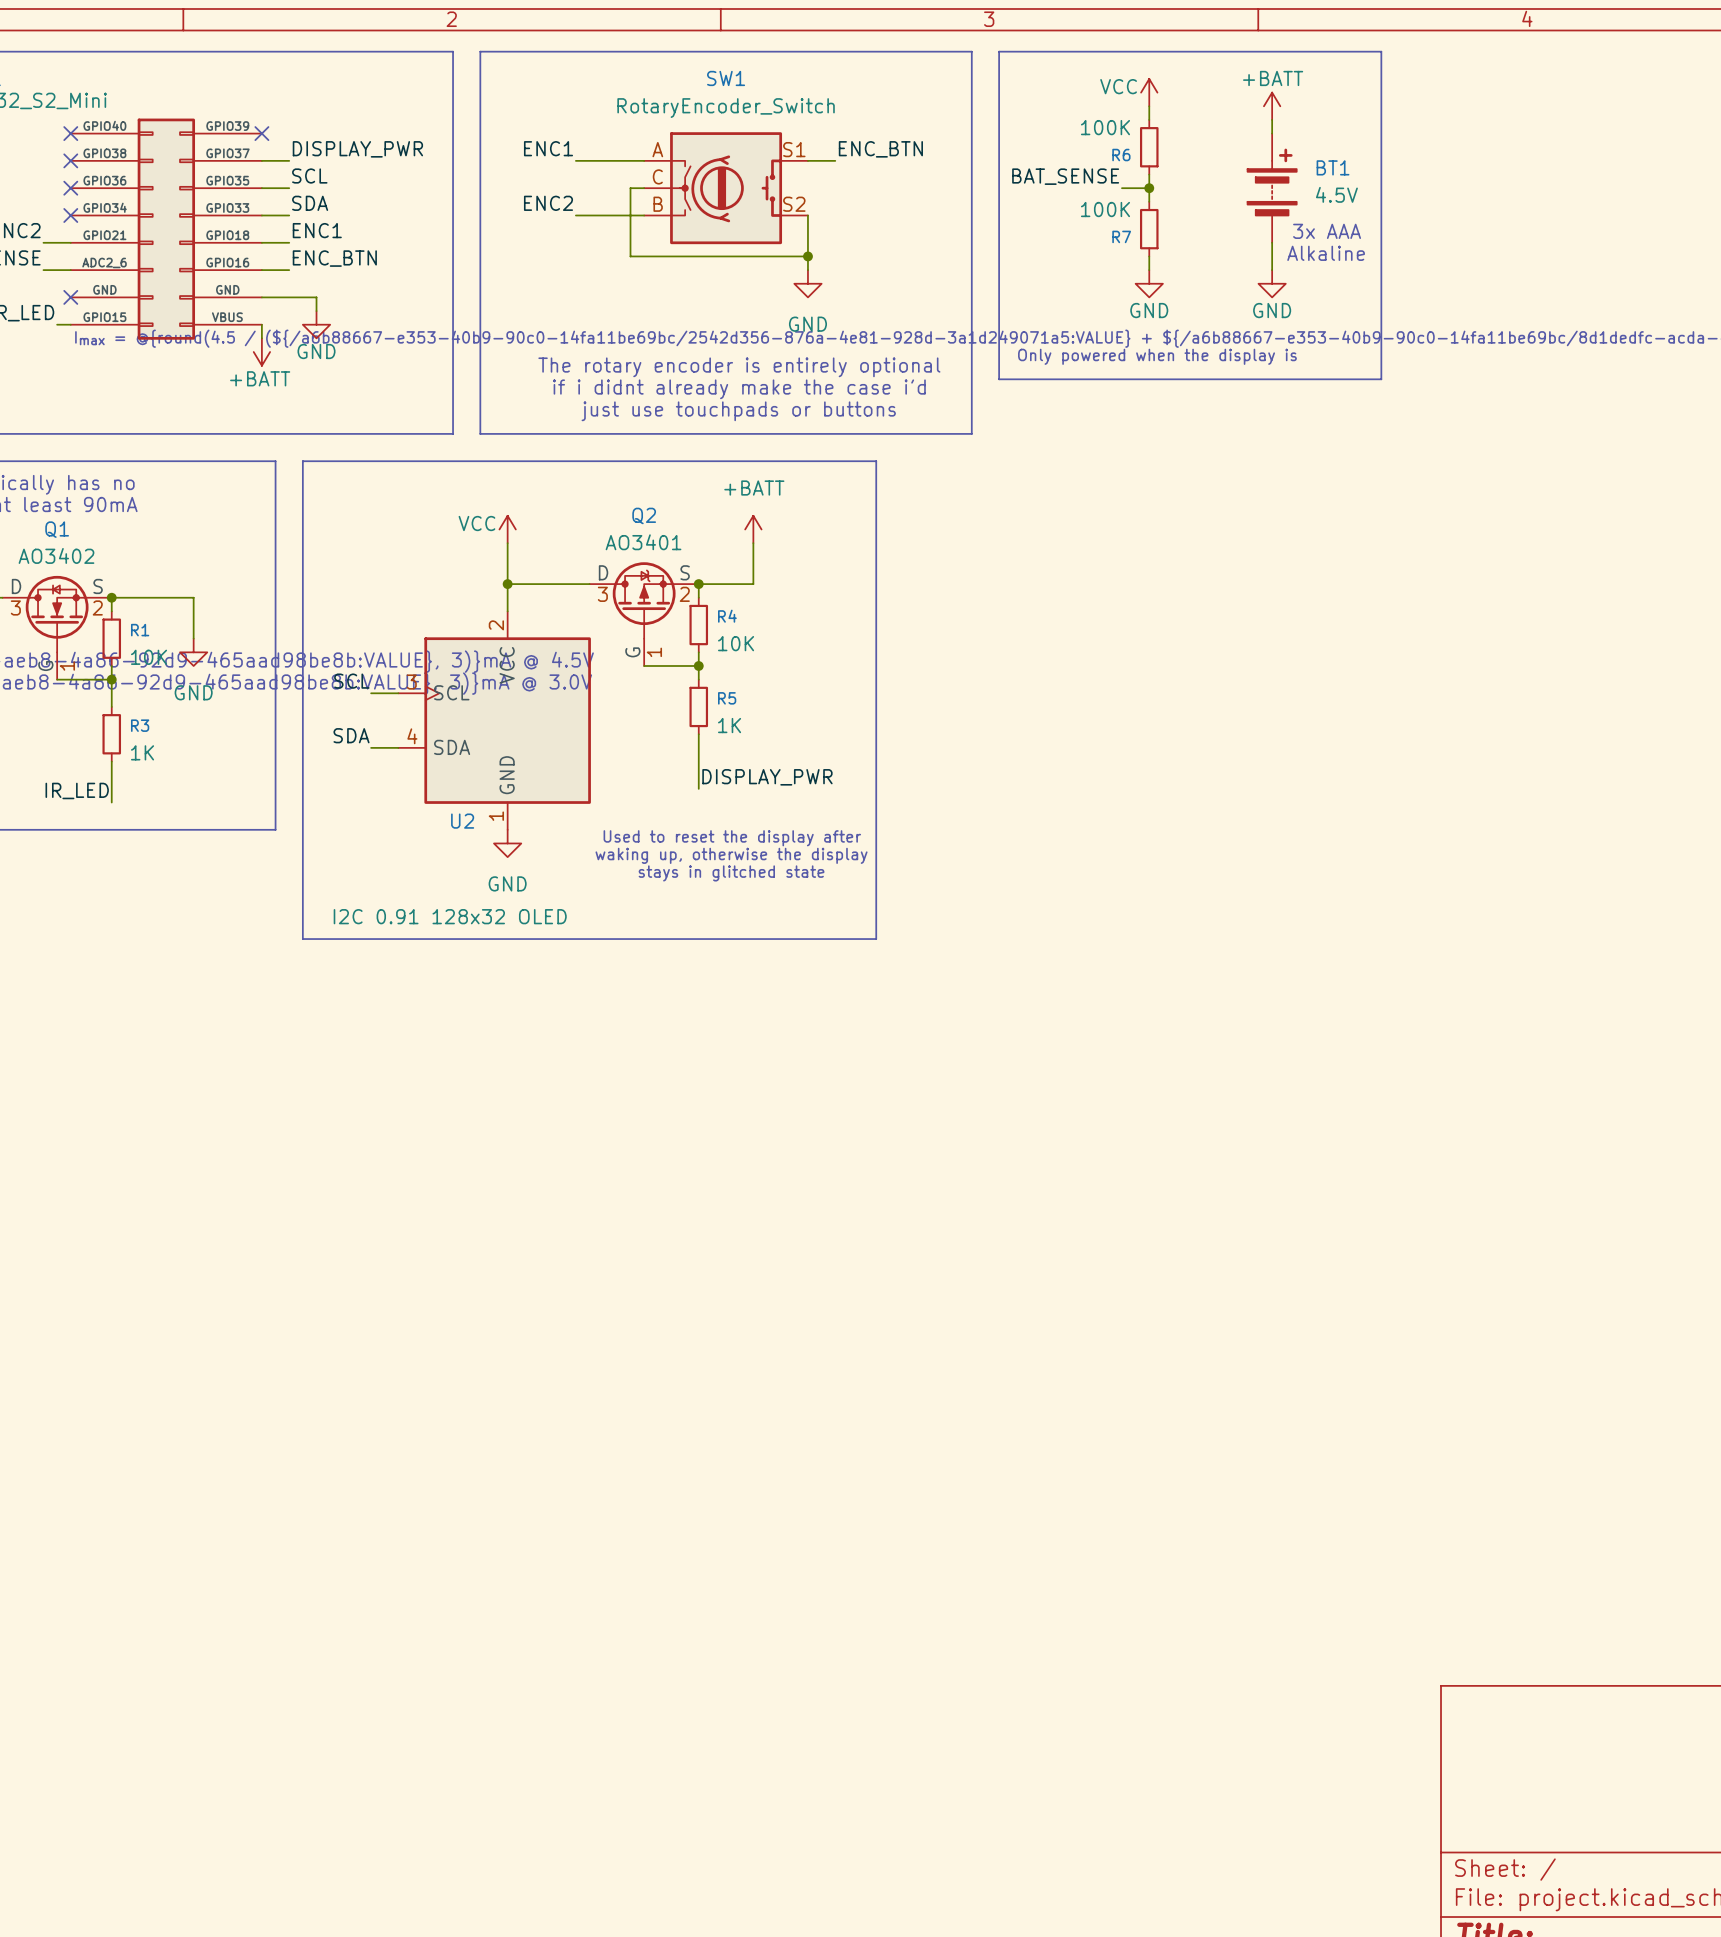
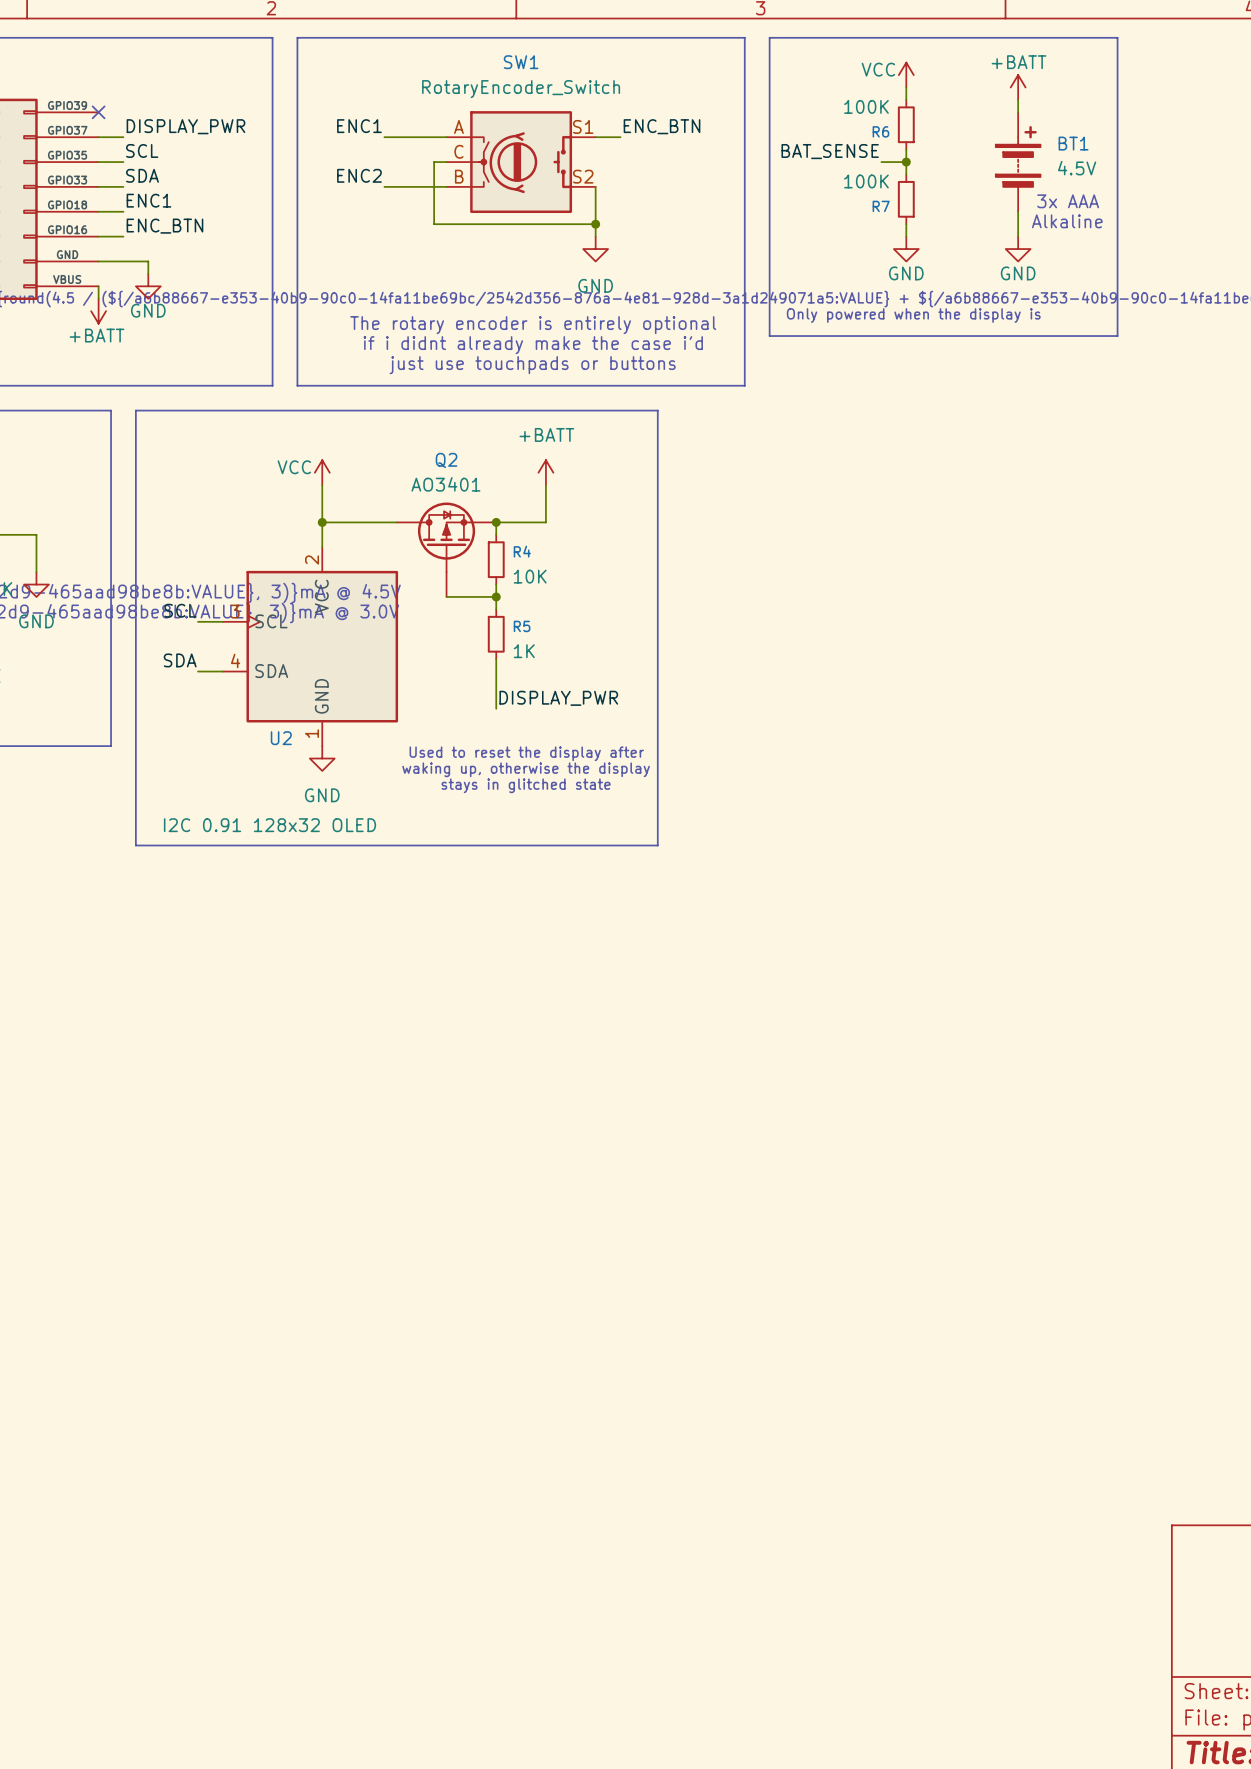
Q2 symbol: [589, 562, 699, 666] -> [396, 502, 497, 597]

